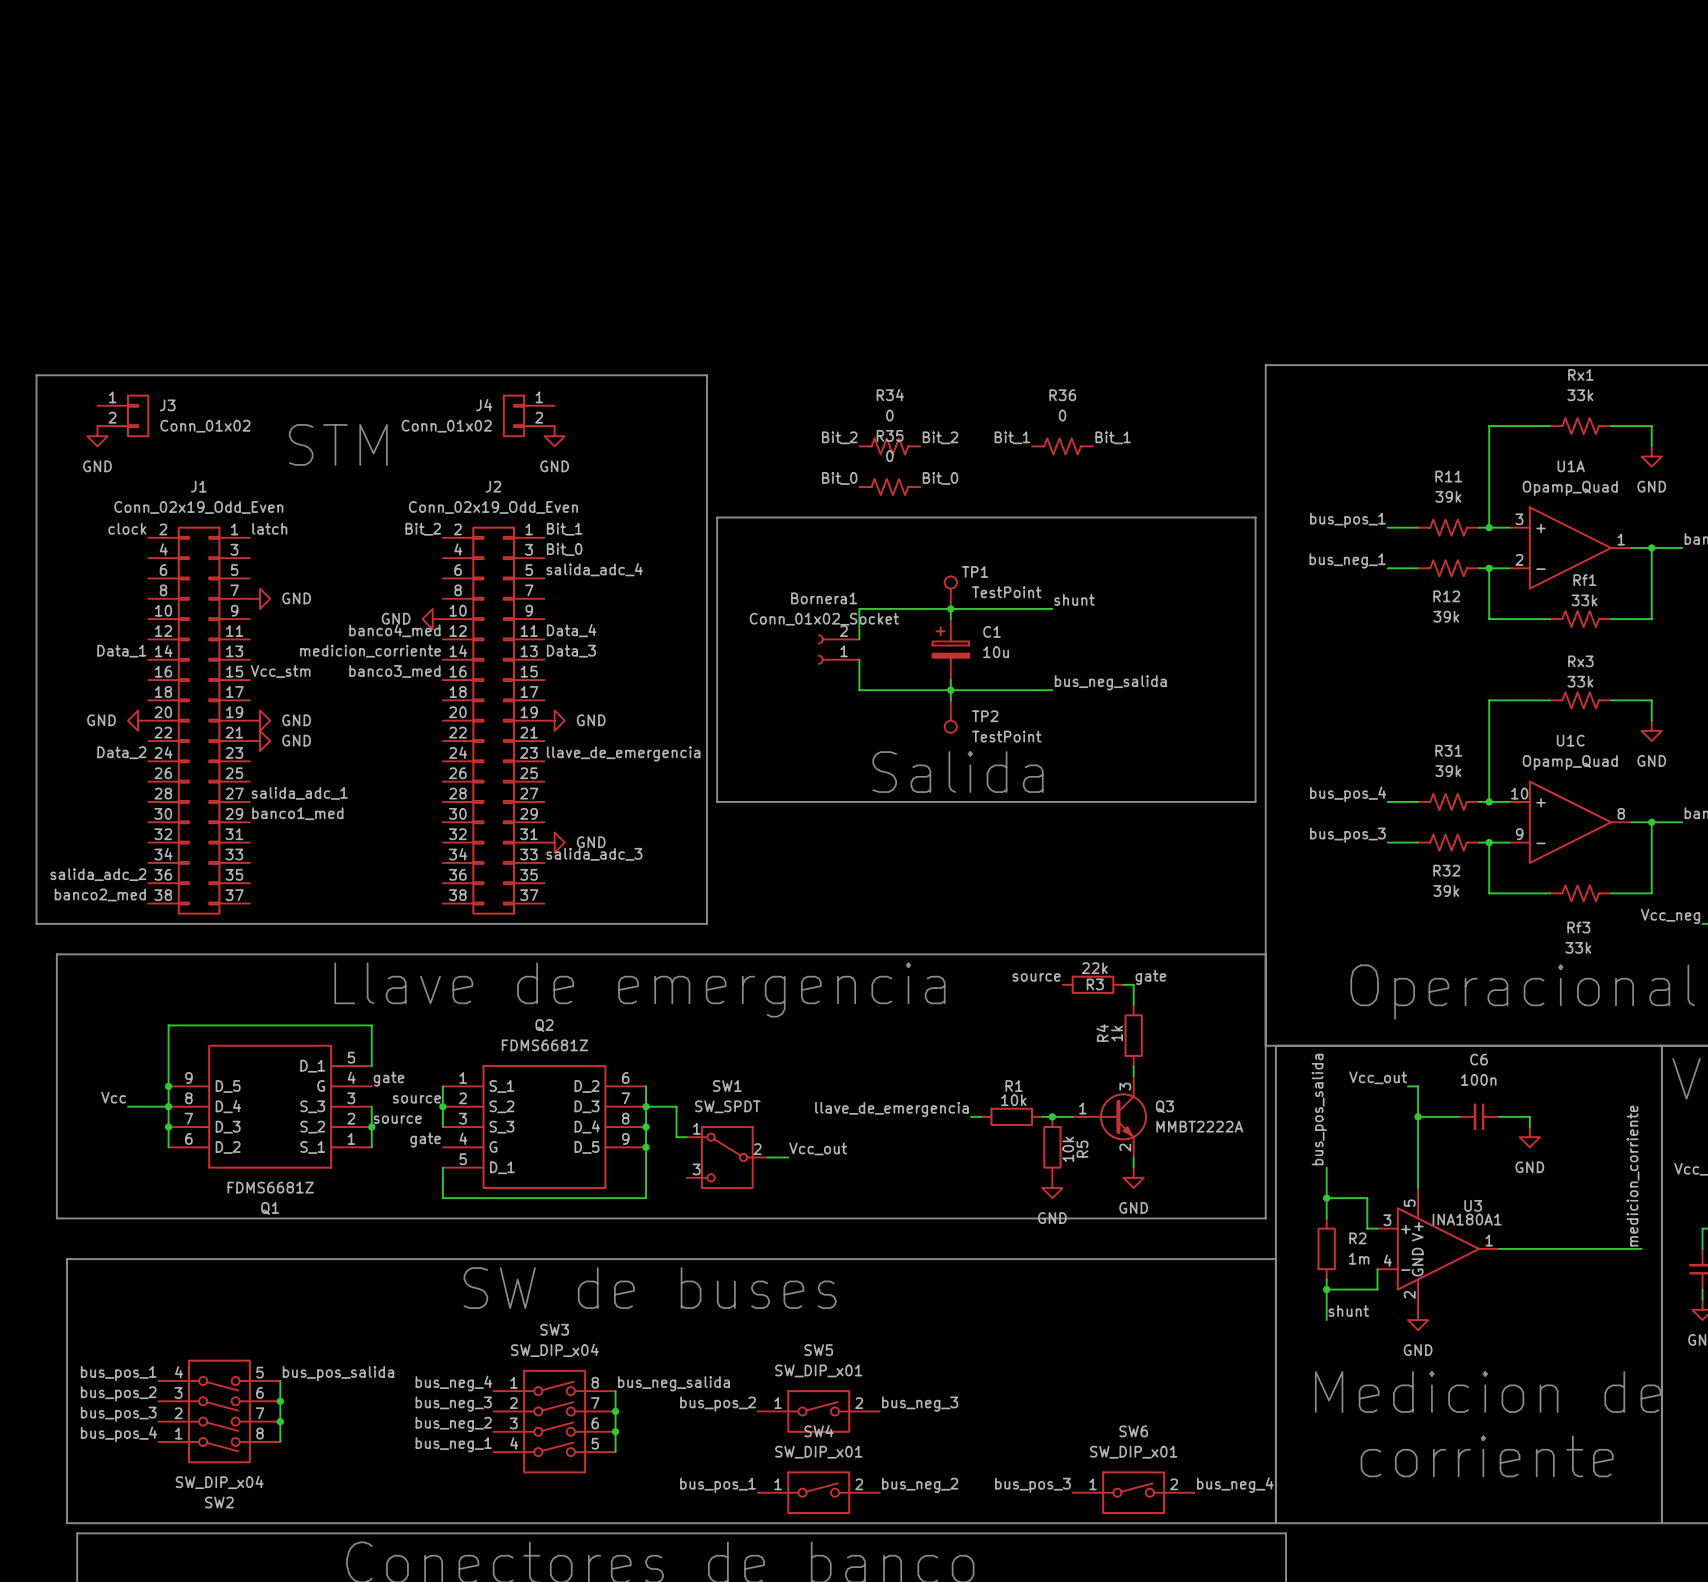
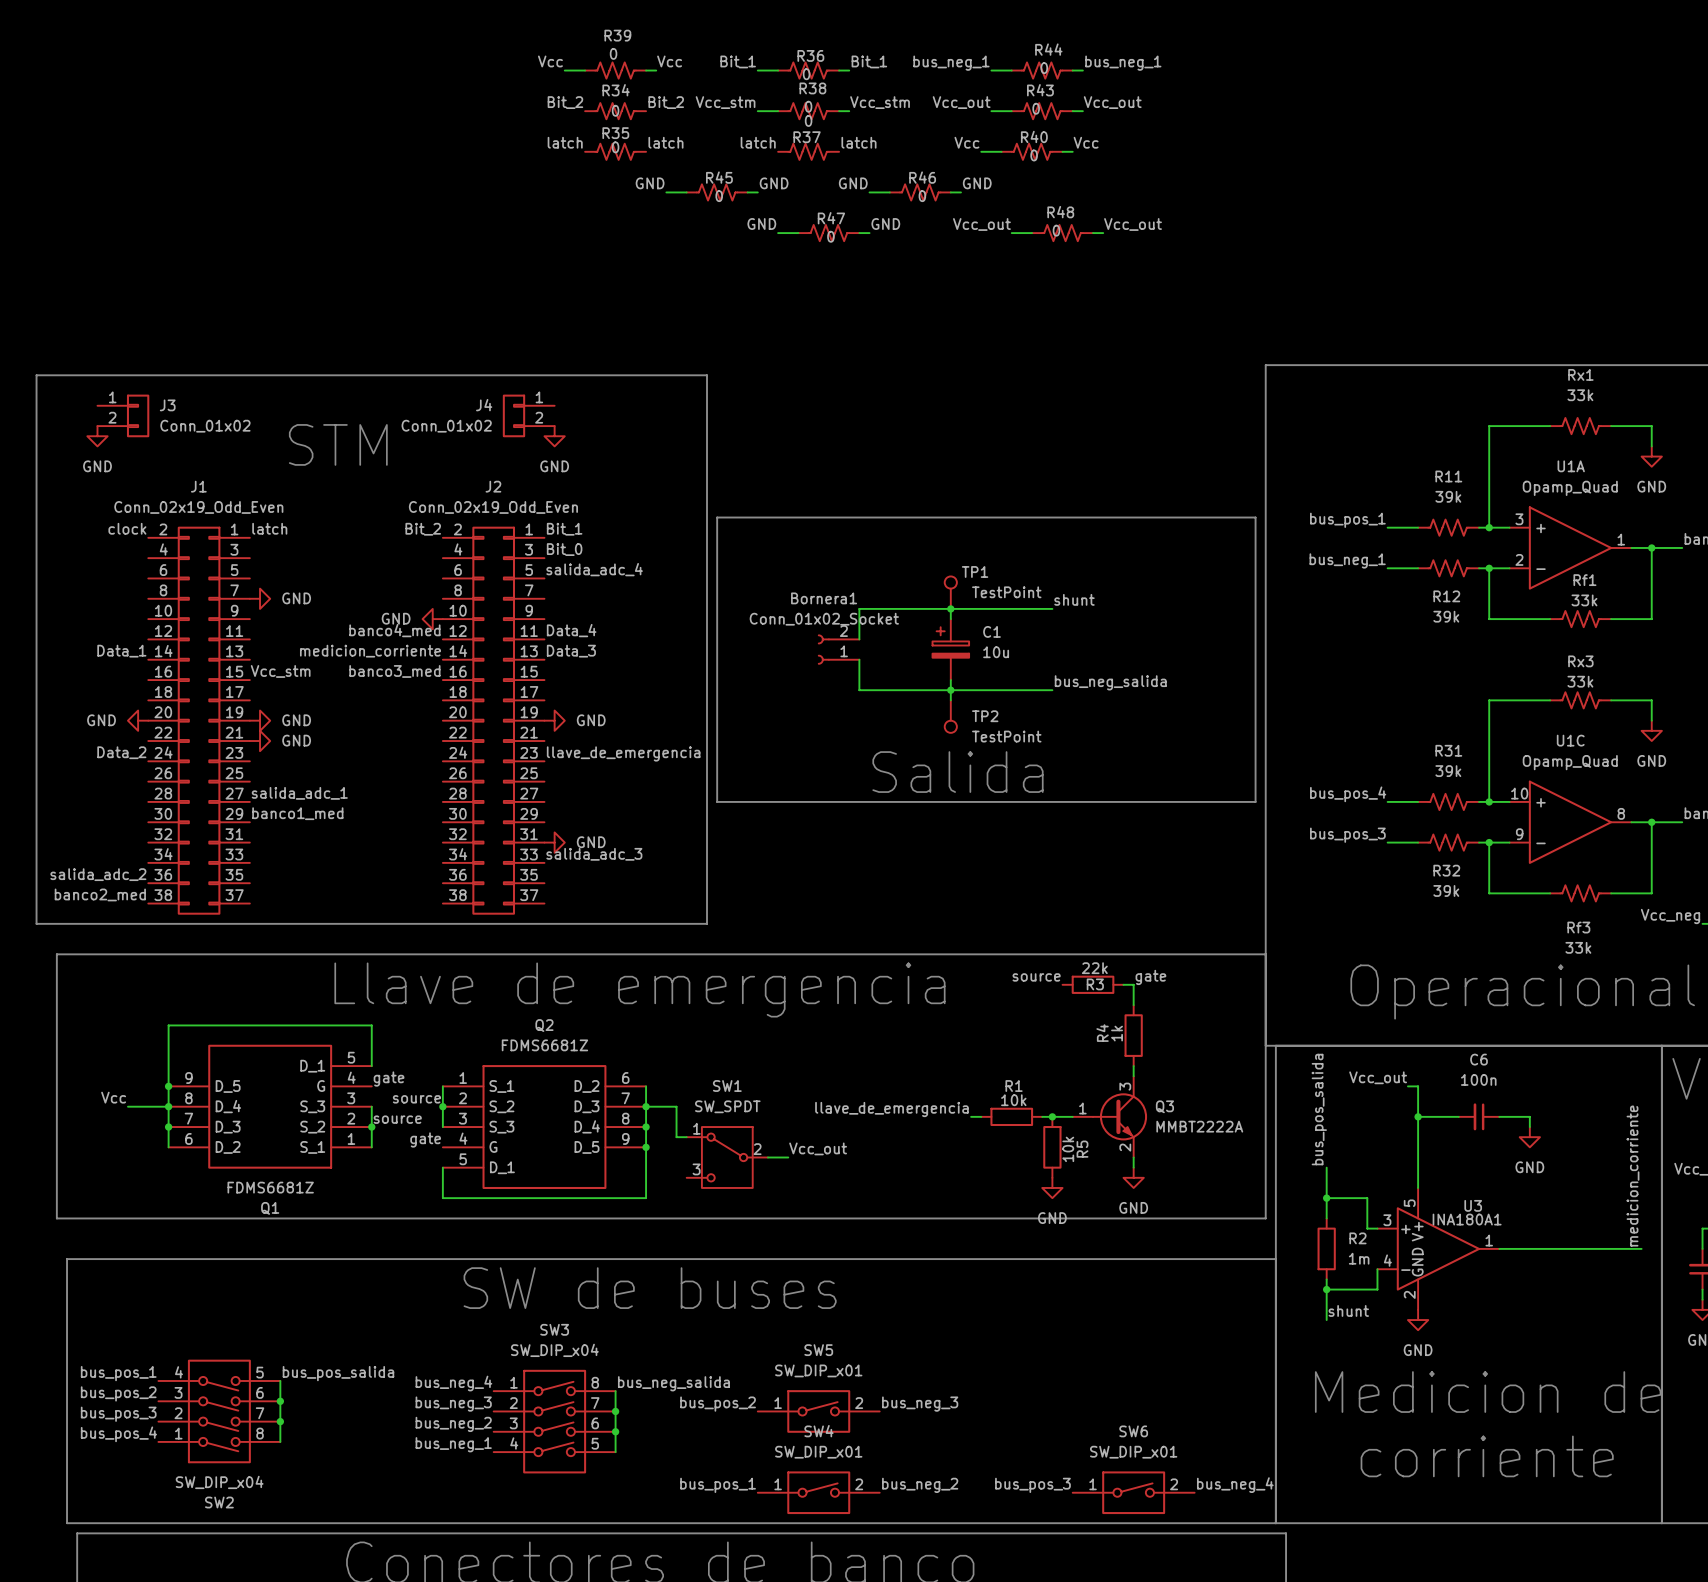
label: none -> Vcc (550, 61)
label: none -> Vcc (669, 61)
label: none -> Bit_1 (738, 61)
label: none -> Bit_1 (869, 61)
label: none -> bus_neg_1 (951, 63)
label: none -> bus_neg_1 (1123, 63)
wire: none -> (564, 70) (585, 70)
R39: none -> 0 (615, 70)
wire: none -> (646, 70) (656, 70)
wire: none -> (757, 70) (778, 70)
wire: none -> (839, 70) (849, 70)
wire: none -> (991, 70) (1011, 70)
R44: none -> 0 (1042, 70)
wire: none -> (1072, 70) (1082, 70)
label: none -> Bit_2 (565, 102)
label: none -> Bit_2 (666, 102)
label: none -> Vcc_stm (725, 102)
label: none -> Vcc_stm (880, 102)
label: none -> Vcc_out (961, 102)
label: none -> Vcc_out (1112, 102)
wire: none -> (757, 111) (778, 111)
R38: none -> 0 (808, 111)
wire: none -> (839, 111) (849, 111)
wire: none -> (991, 111) (1011, 111)
R43: none -> 0 (1042, 111)
wire: none -> (1072, 111) (1082, 111)
label: none -> latch (565, 142)
label: none -> latch (665, 142)
label: none -> latch (758, 142)
label: none -> latch (858, 142)
label: none -> Vcc (966, 142)
label: none -> Vcc (1086, 142)
R37: none -> 0 (808, 151)
wire: none -> (981, 151) (1001, 151)
R40: none -> 0 (1032, 151)
wire: none -> (1062, 151) (1072, 151)
label: none -> GND (650, 183)
label: none -> GND (774, 183)
label: none -> GND (853, 183)
label: none -> GND (977, 183)
wire: none -> (666, 192) (686, 192)
R45: none -> 0 (717, 192)
wire: none -> (747, 192) (757, 192)
wire: none -> (869, 192) (889, 192)
R46: none -> 0 (920, 192)
wire: none -> (950, 192) (960, 192)
label: none -> GND (761, 224)
label: none -> GND (885, 224)
label: none -> Vcc_out (981, 224)
label: none -> Vcc_out (1133, 224)
wire: none -> (778, 233) (798, 233)
R47: none -> 0 (828, 233)
wire: none -> (859, 233) (869, 233)
wire: none -> (1011, 233) (1032, 233)
R48: none -> 0 (1062, 233)
wire: none -> (1093, 233) (1103, 233)
R34 name position: R34 (890, 394) -> R34 (616, 90)
R36 name position: R36 (1062, 395) -> R36 (810, 55)
R34 value position: 0 (889, 415) -> 0 (615, 110)
R36 value position: 0 (1062, 415) -> 0 (806, 74)
R35 name position: R35 (890, 435) -> R35 (615, 133)
label: Bit_2 (839, 437) -> none
label: Bit_2 (940, 437) -> none
label: Bit_1 (1012, 437) -> none
label: Bit_1 (1113, 437) -> none
R34 position: (889, 446) -> (615, 111)
R36 position: (1062, 446) -> (808, 70)
R35 value position: 0 (889, 456) -> 0 (615, 147)
label: Bit_0 (839, 478) -> none
label: Bit_0 (940, 478) -> none
R35 position: (889, 487) -> (615, 151)

